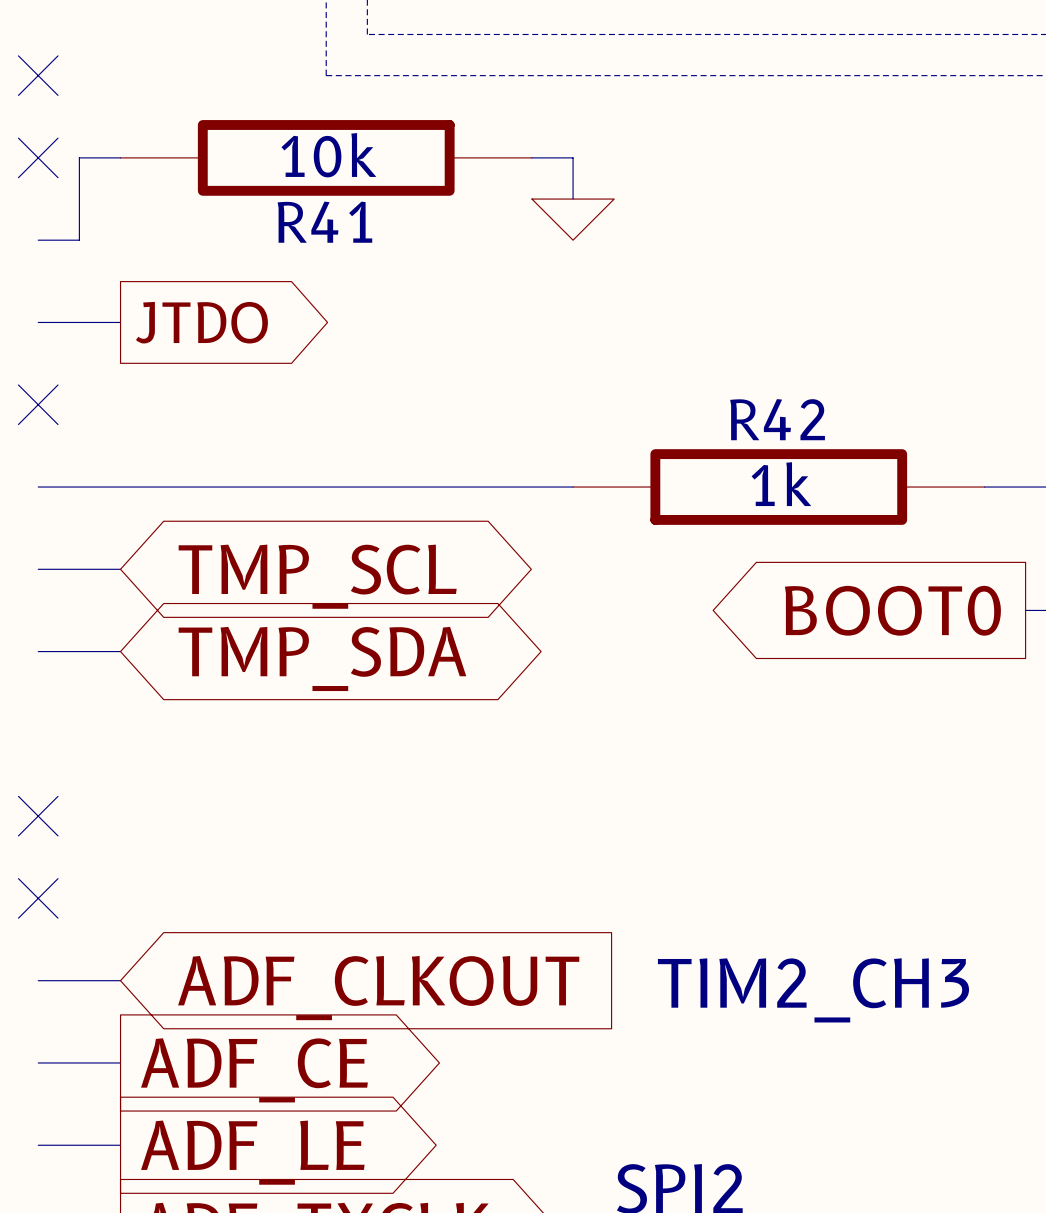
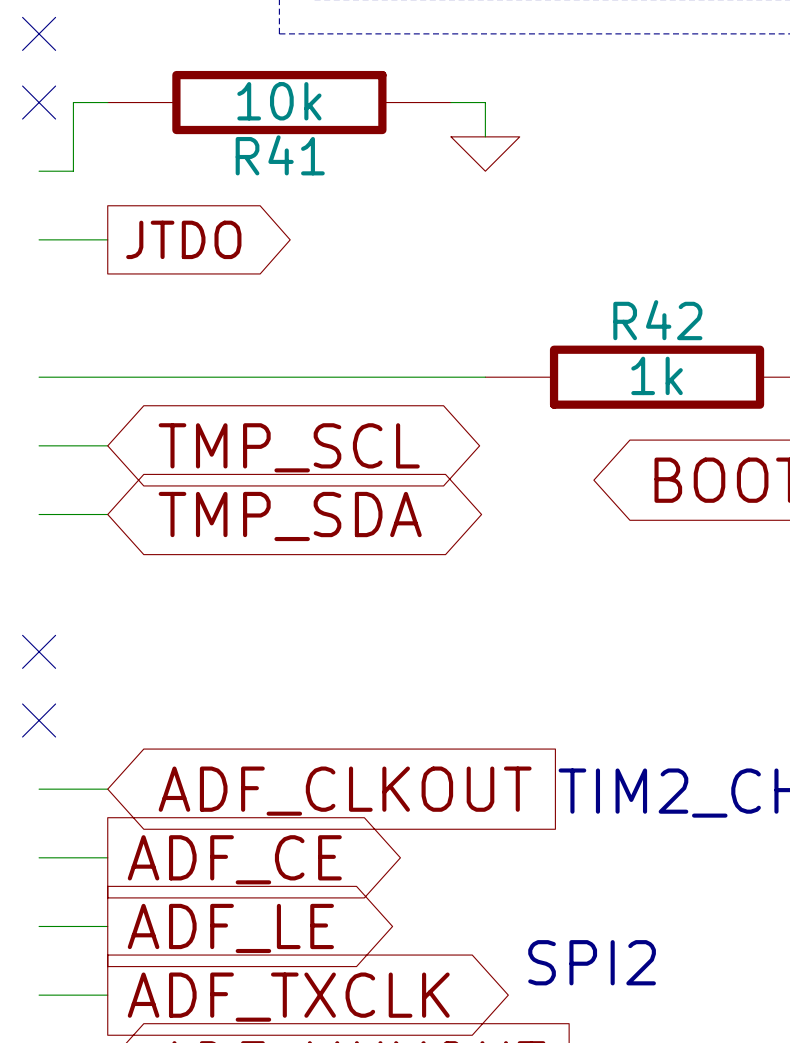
no-connect mark: (38, 404) -> none

